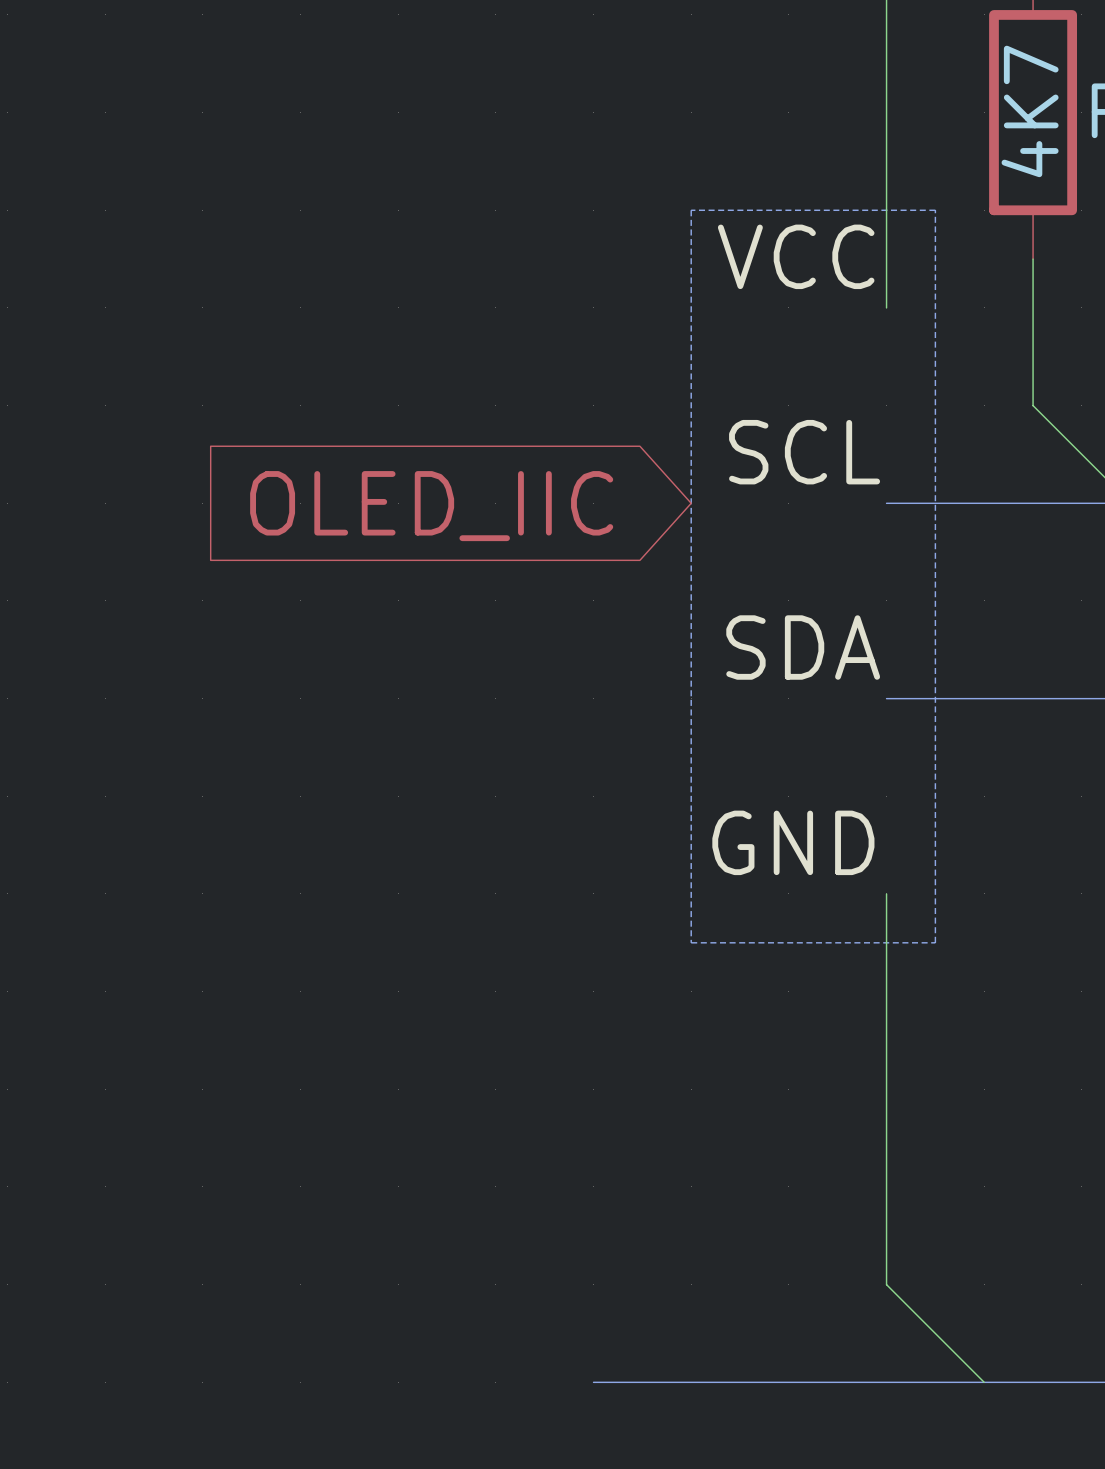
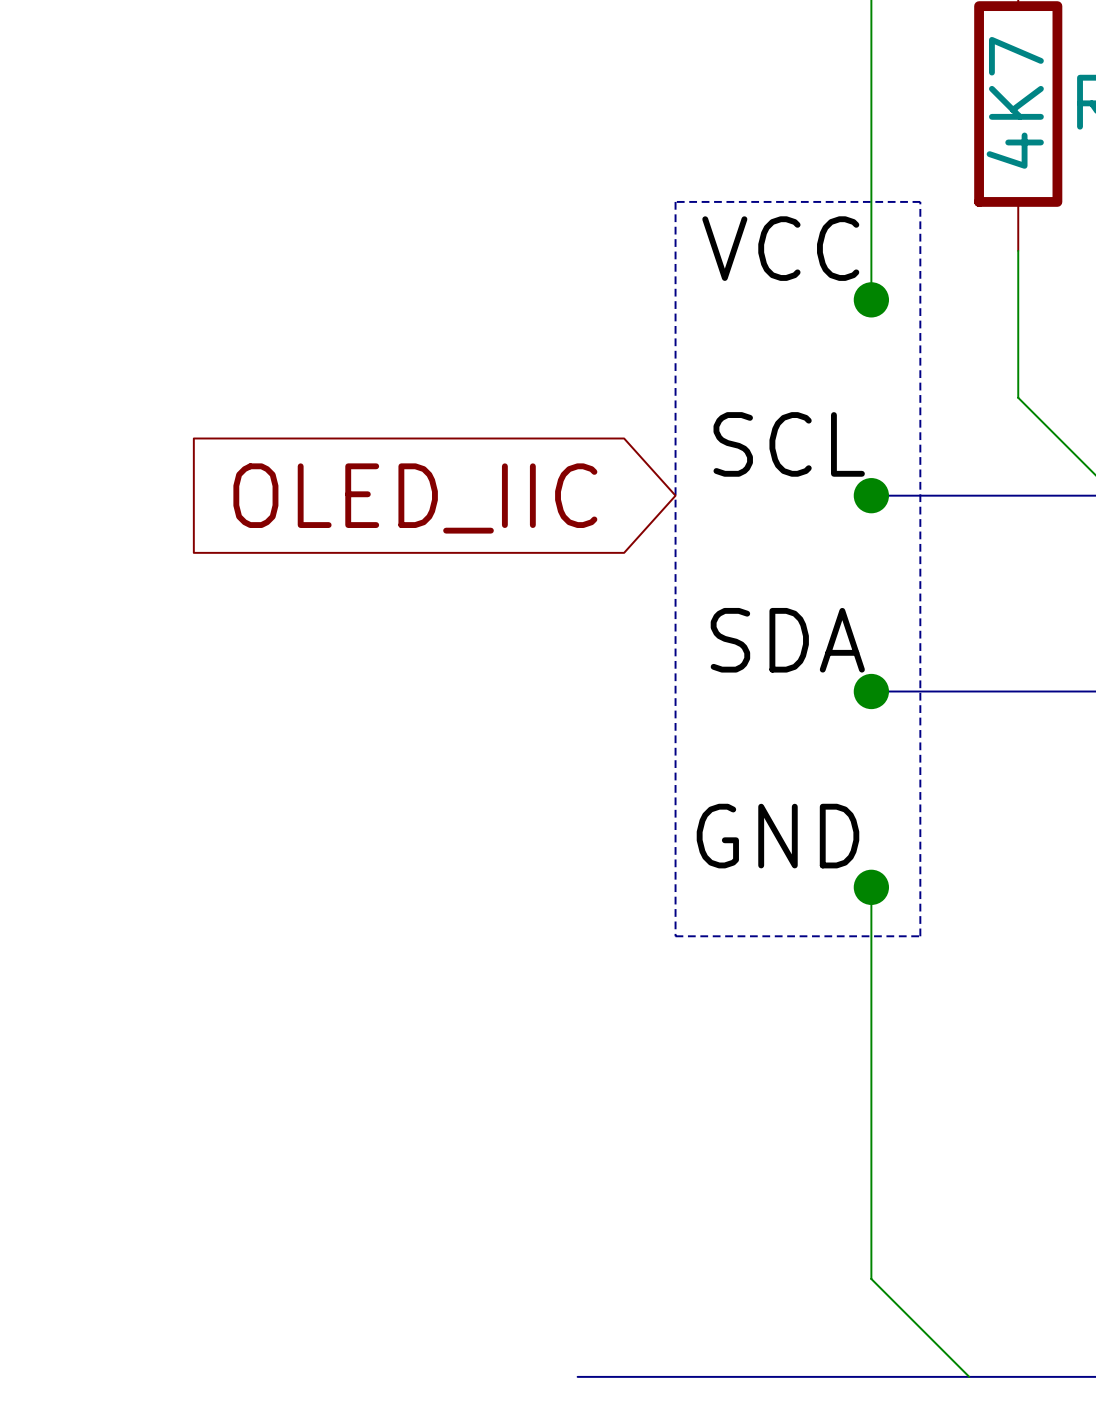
junction: none -> (871, 299)
junction: none -> (871, 495)
junction: none -> (871, 691)
junction: none -> (871, 887)

